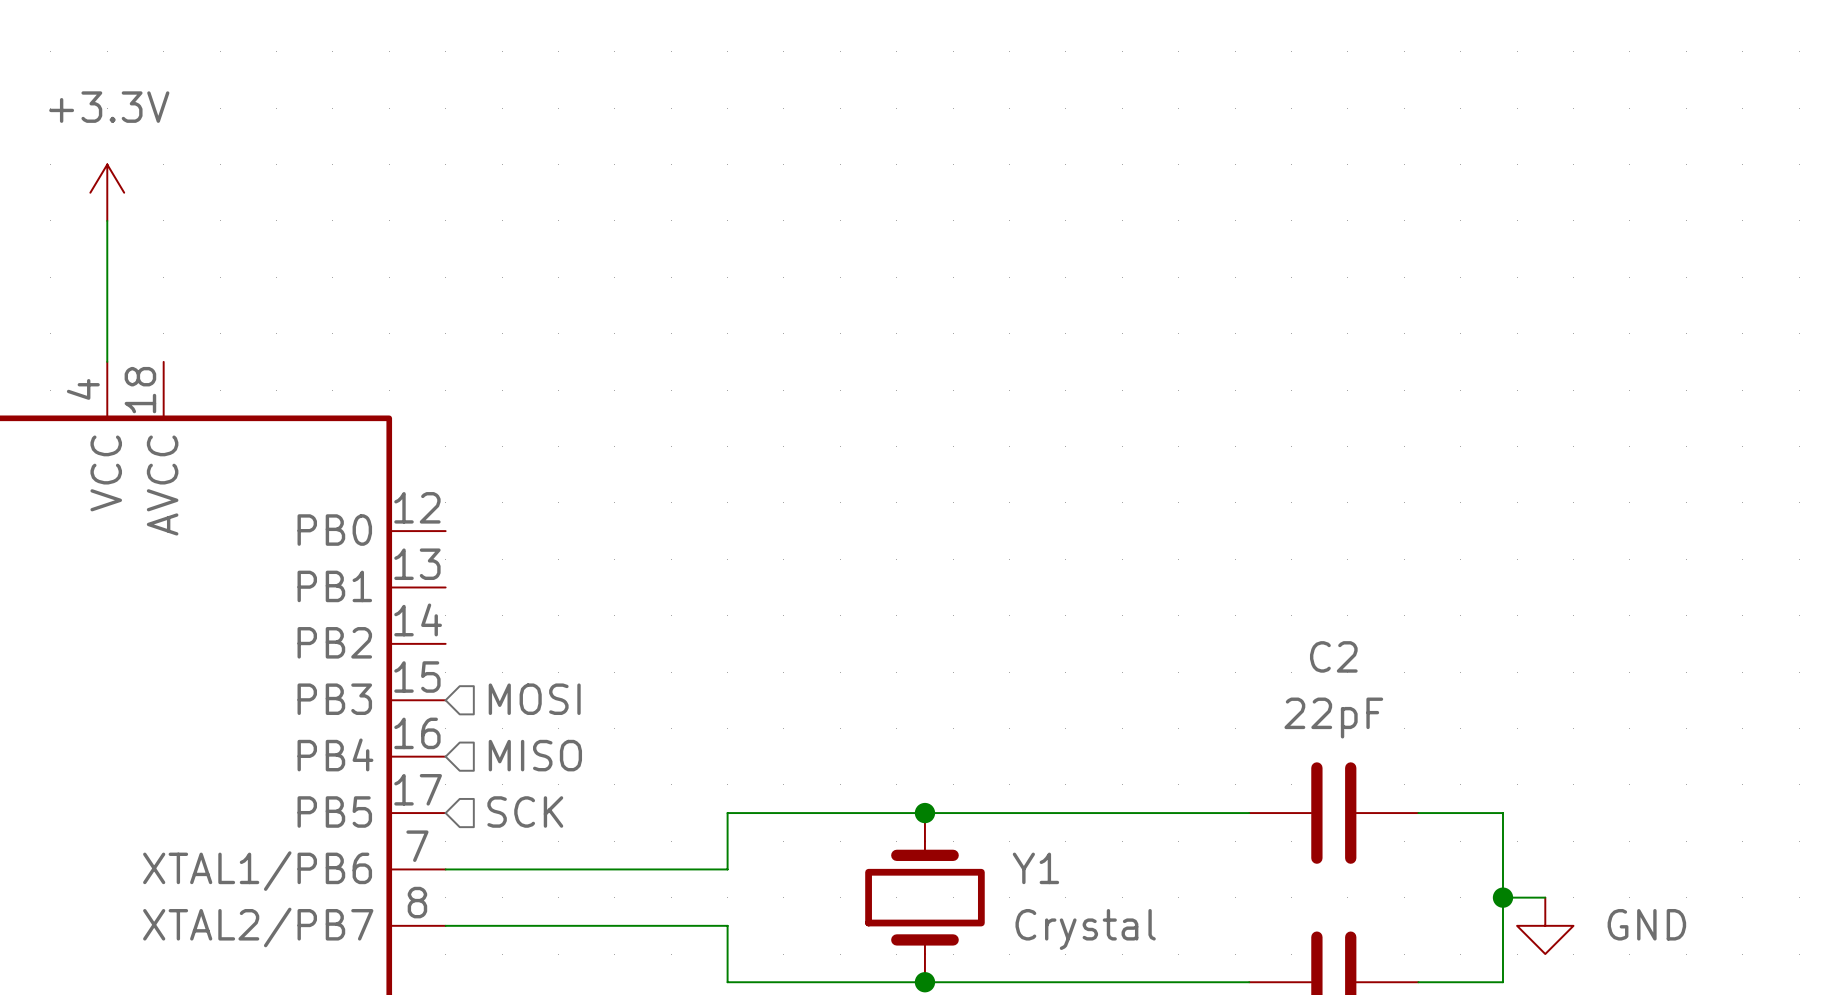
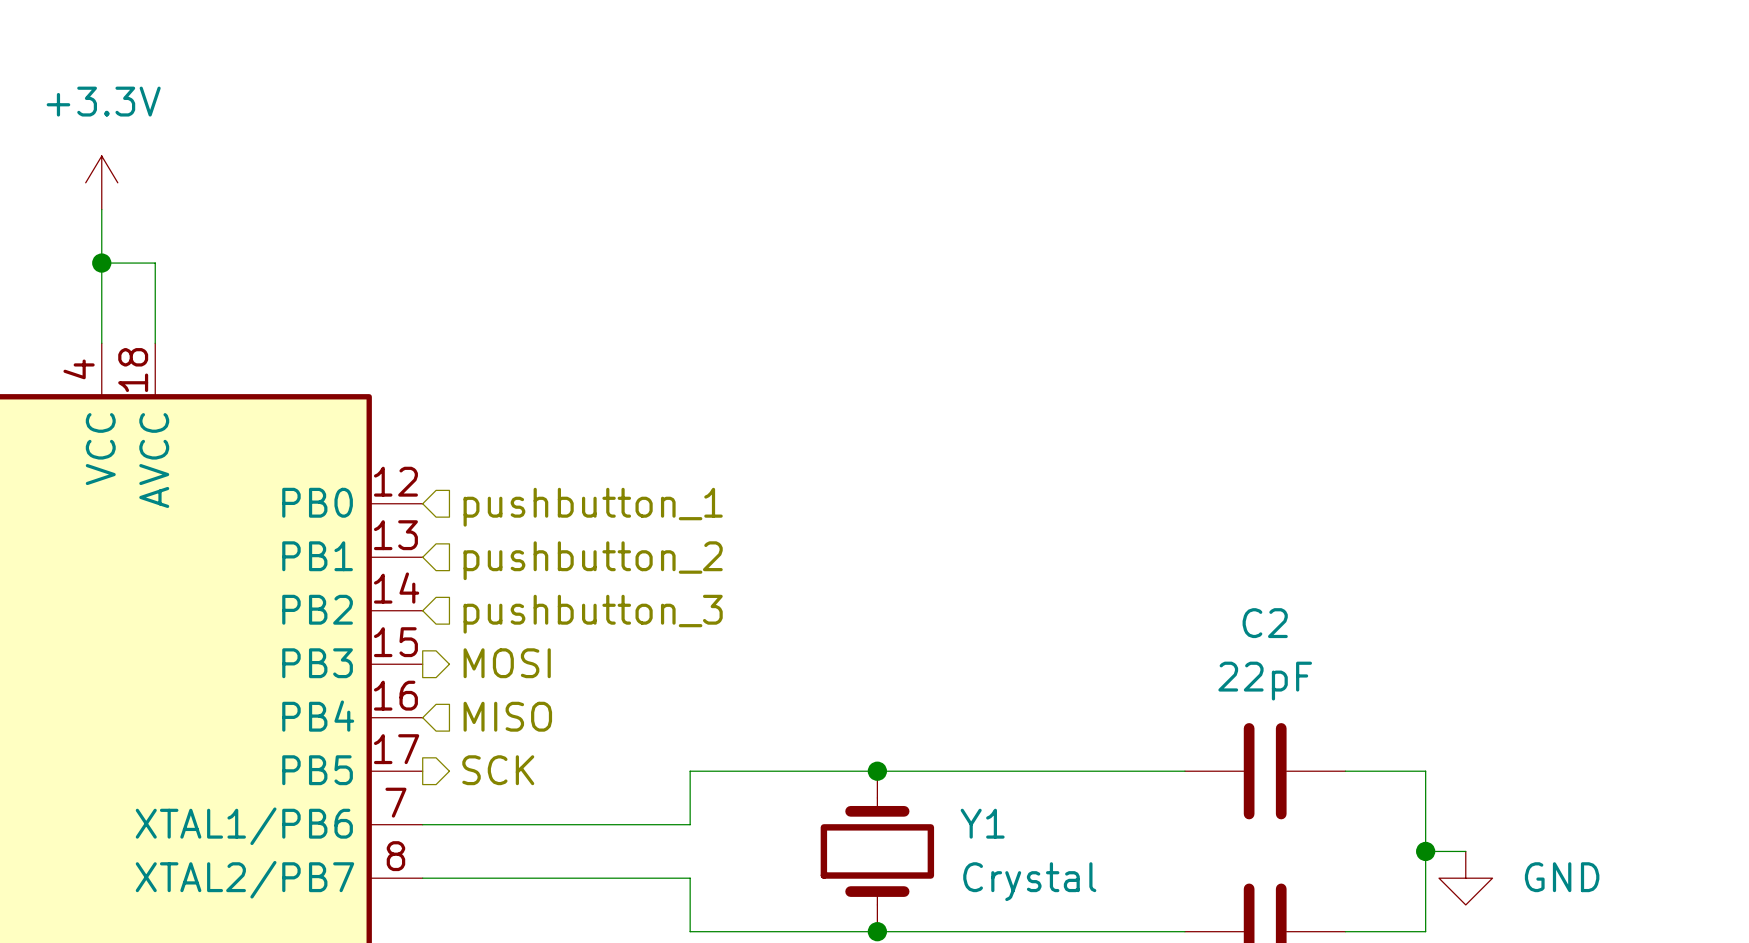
wire: none -> (101, 263) (155, 263) (155, 343)
junction: none -> (101, 263)
hierarchical label: none -> pushbutton_1 (593, 507)
hierarchical label: none -> pushbutton_2 (593, 560)
hierarchical label: none -> pushbutton_3 (593, 614)
hierarchical label shape: input (534, 699) -> output (507, 663)
hierarchical label shape: input (525, 812) -> output (498, 770)

